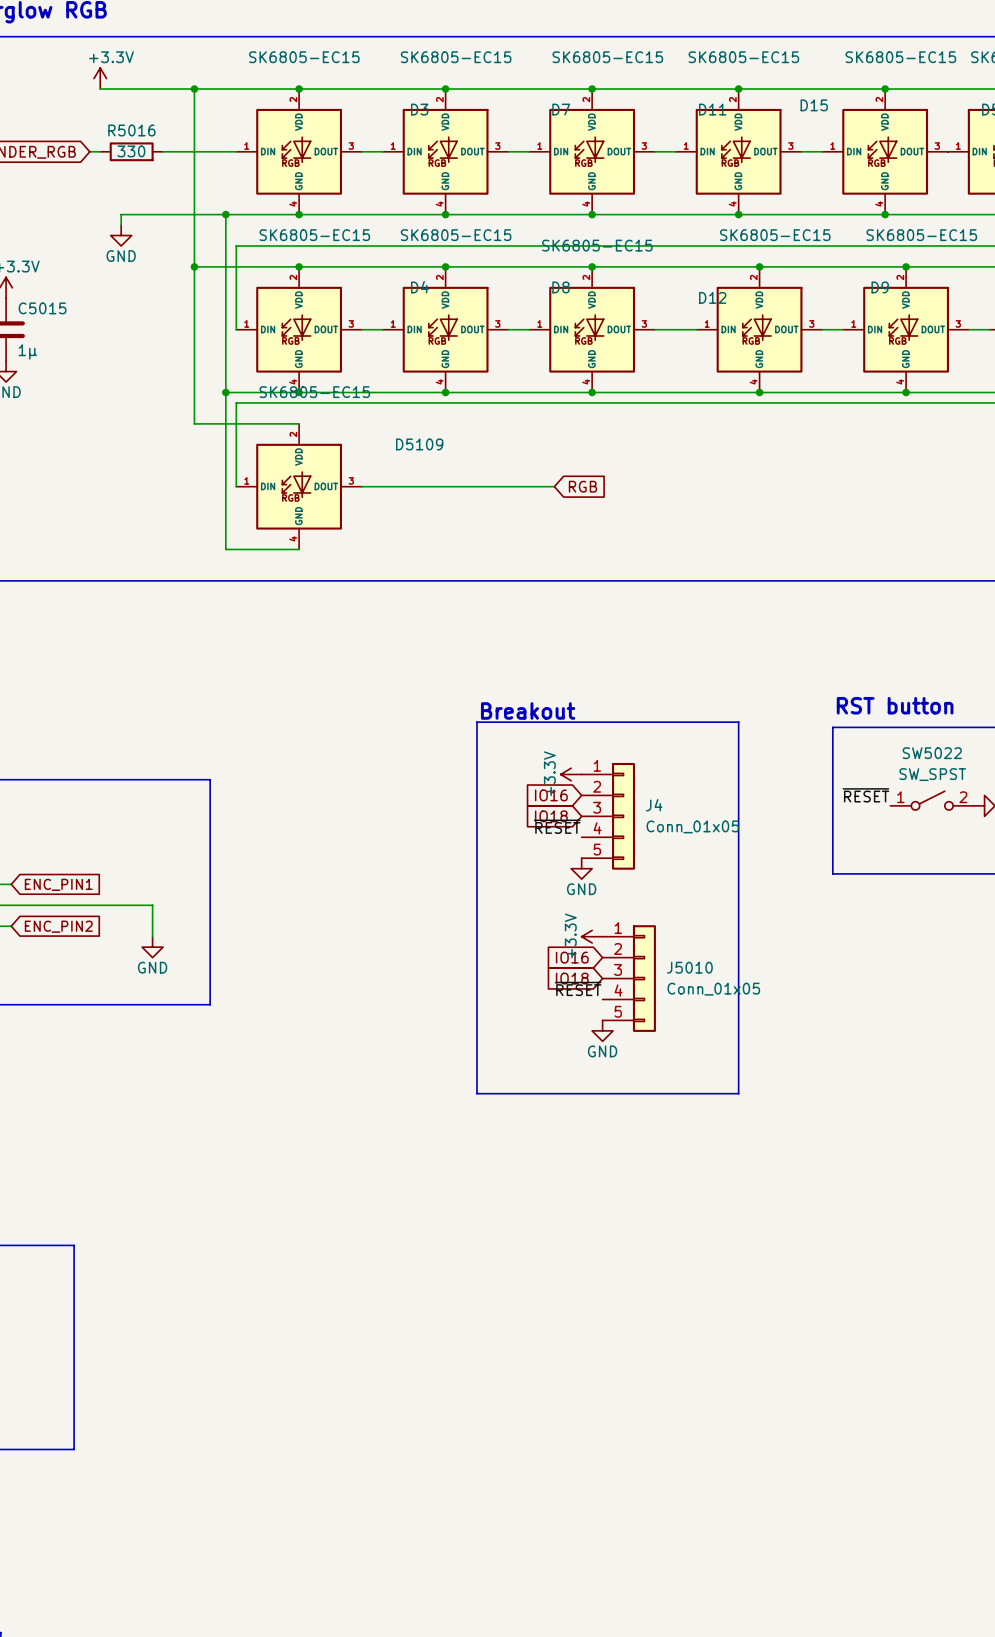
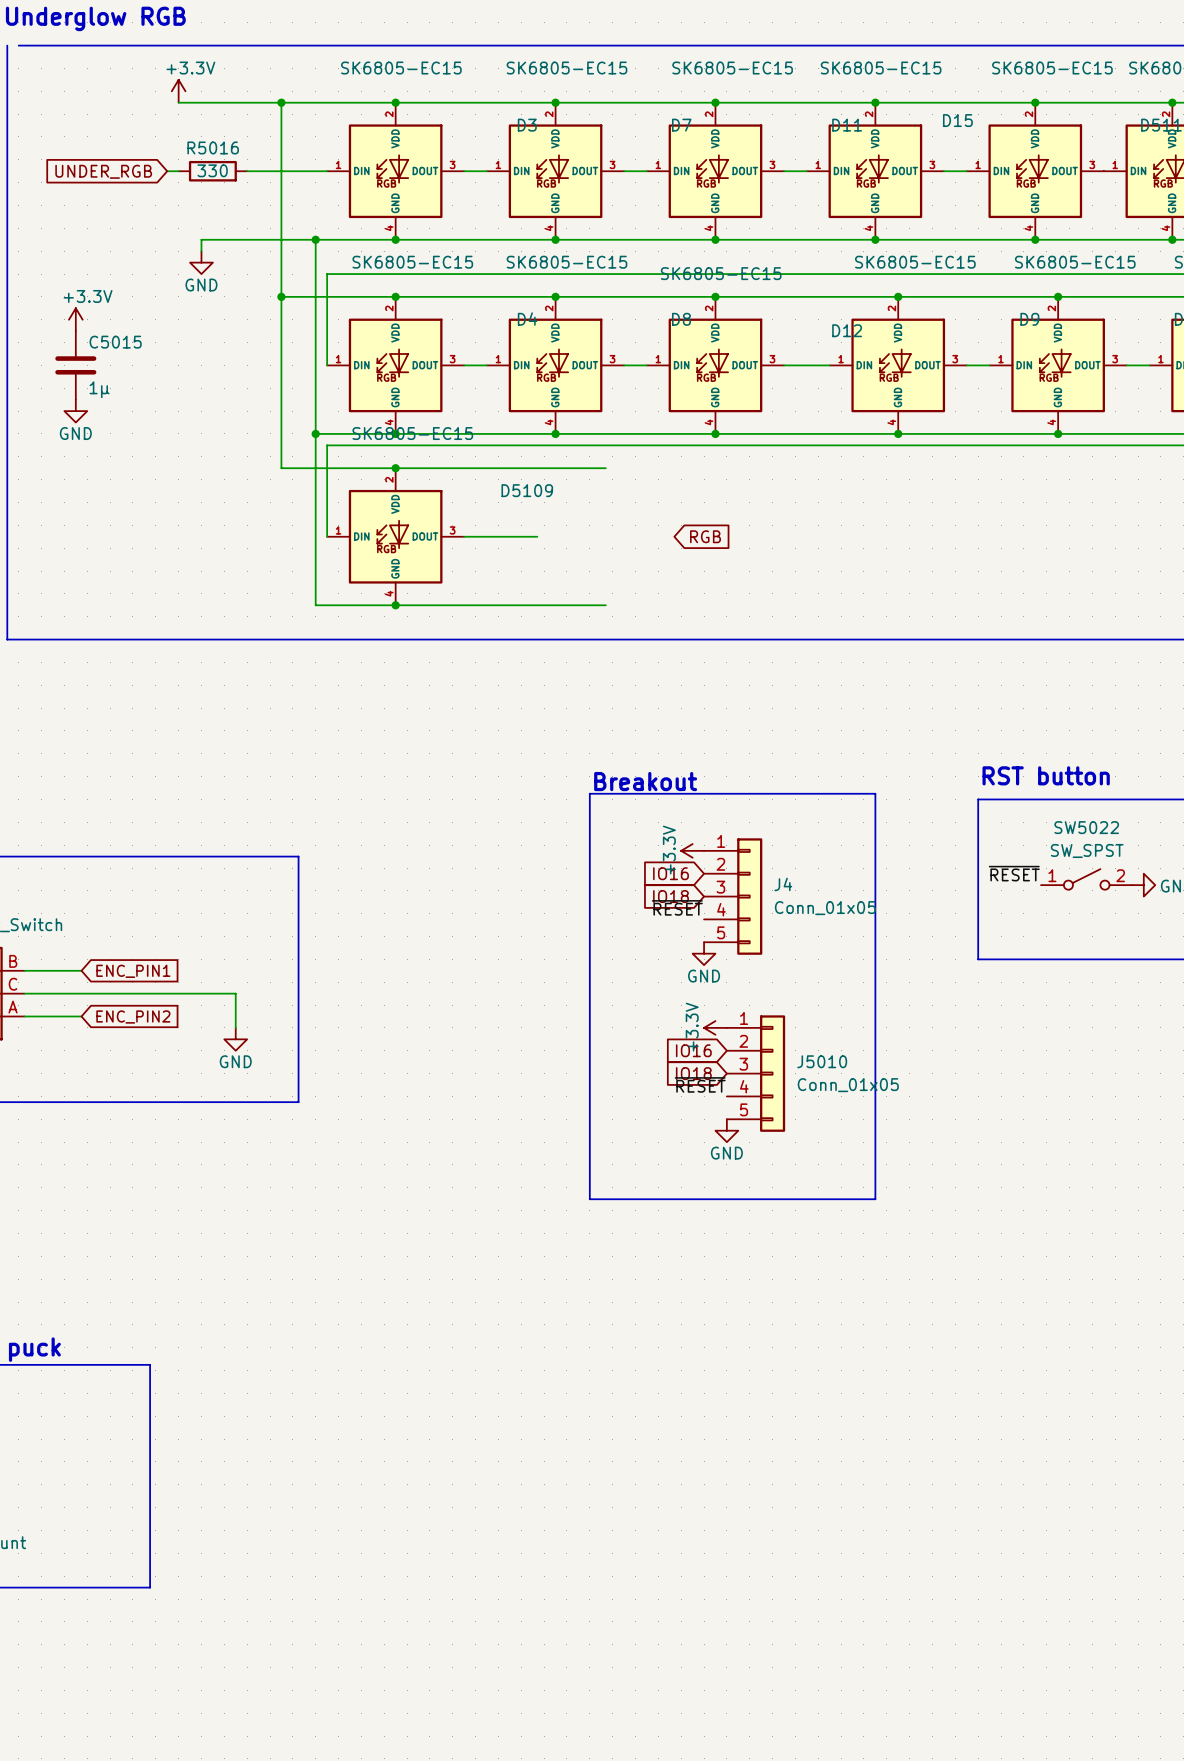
wire: none -> (395, 468) (605, 468)
junction: none -> (395, 468)
wire: (428, 486) (554, 486) -> none
wire: none -> (395, 605) (605, 605)
junction: none -> (395, 605)

